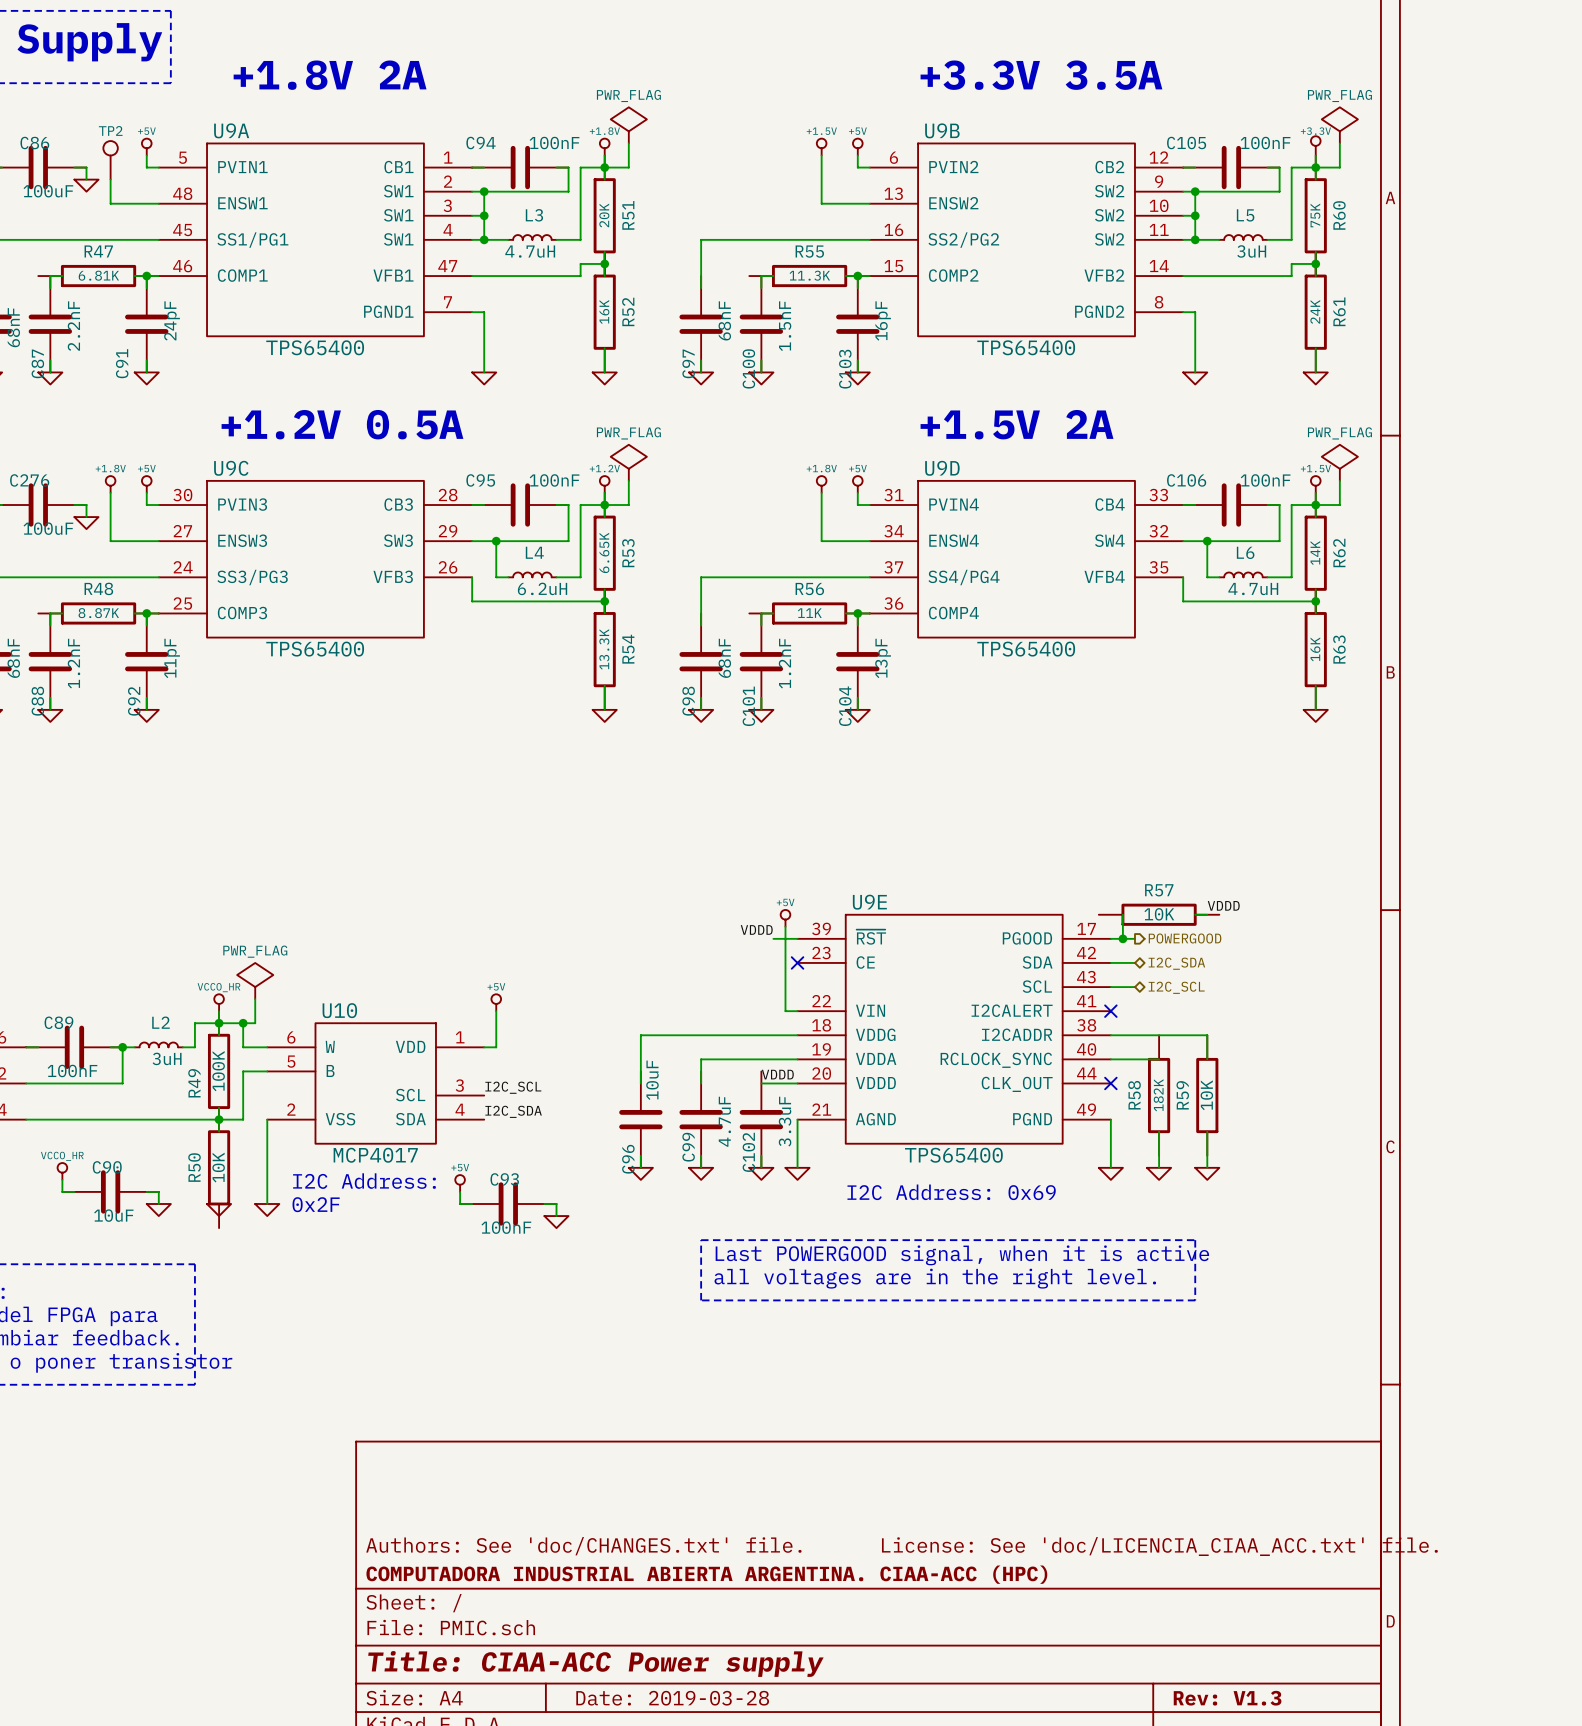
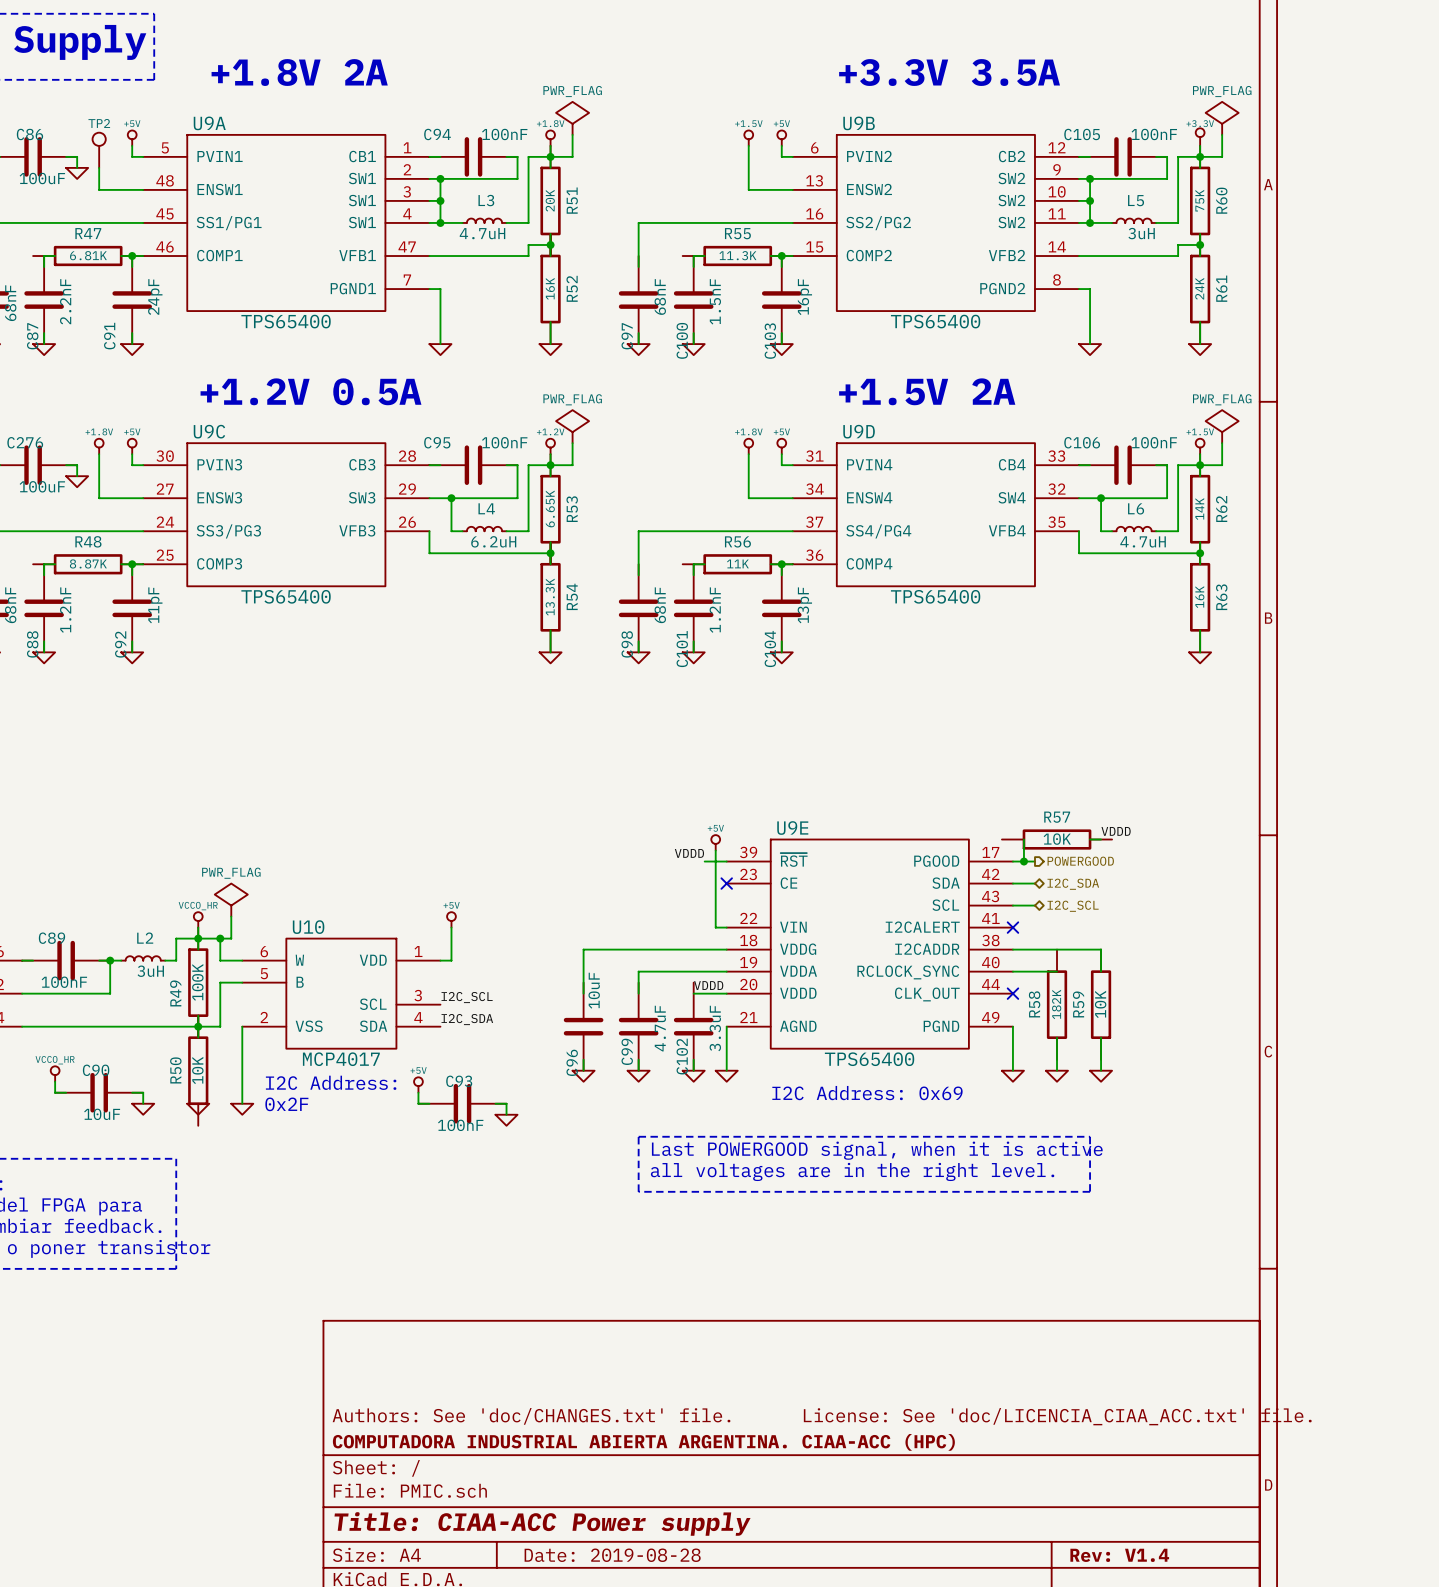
title block: Date: 2019-03-28 (672, 1698) -> Date: 2019-08-28 (612, 1555)
title block: Rev: V1.3 (1227, 1698) -> Rev: V1.4 (1119, 1555)

